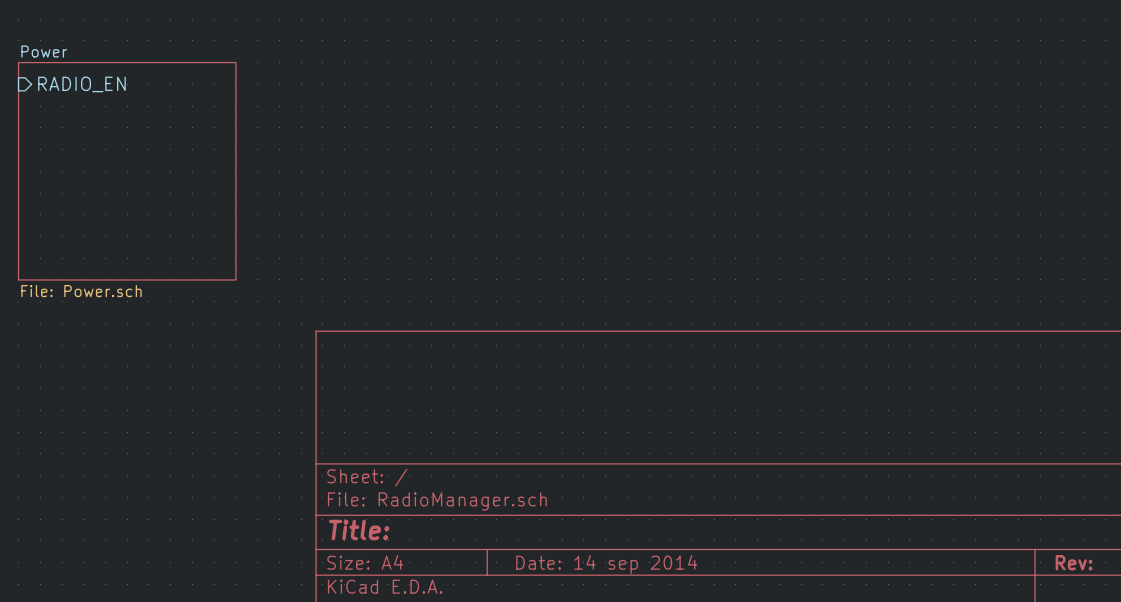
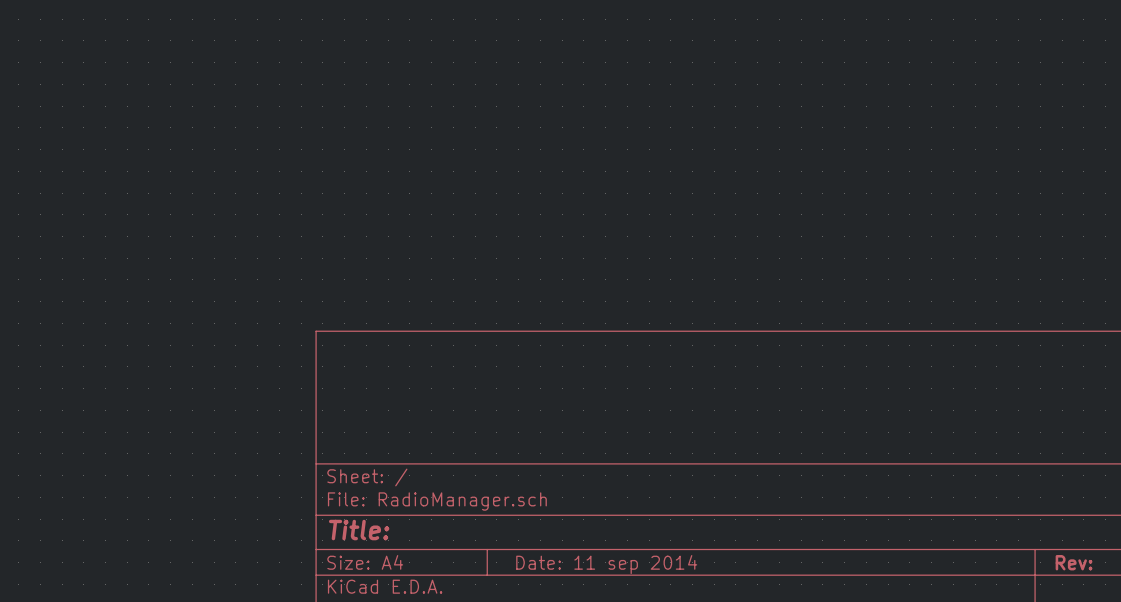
sheet pin: RADIO_EN (81, 84) -> none
sheet Power: File: Power.sch (127, 171) -> none
title block: Date: 14 sep 2014 (606, 564) -> Date: 11 sep 2014 (606, 564)

